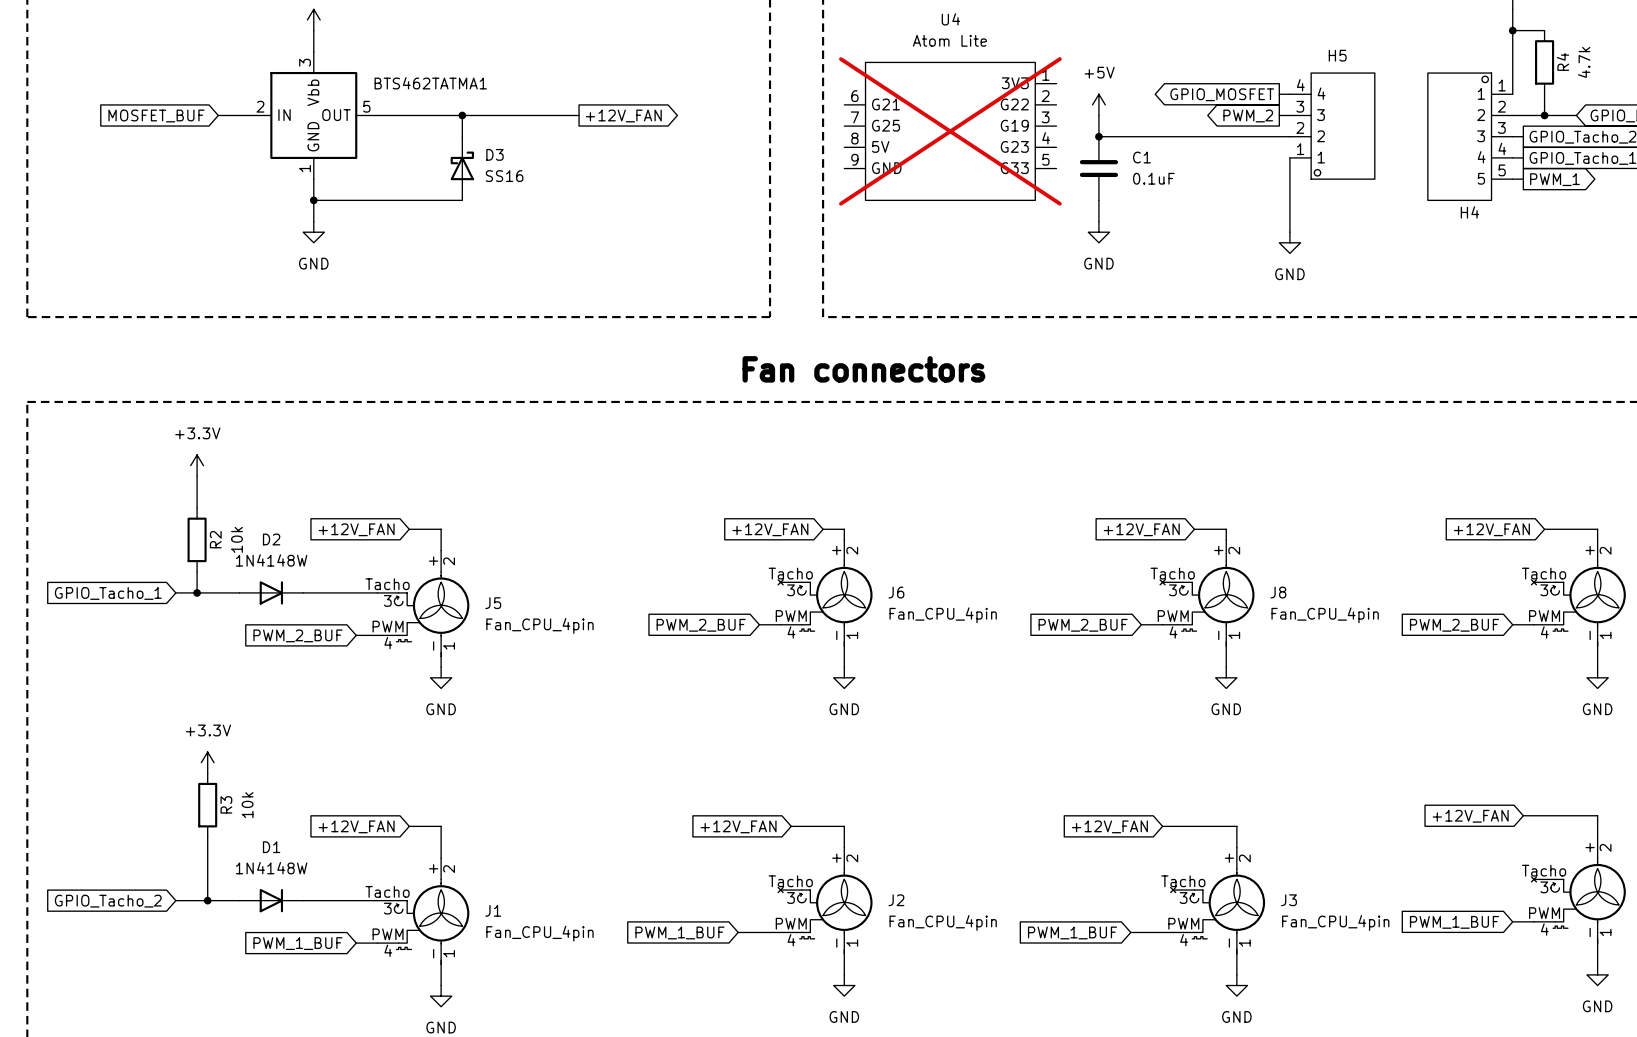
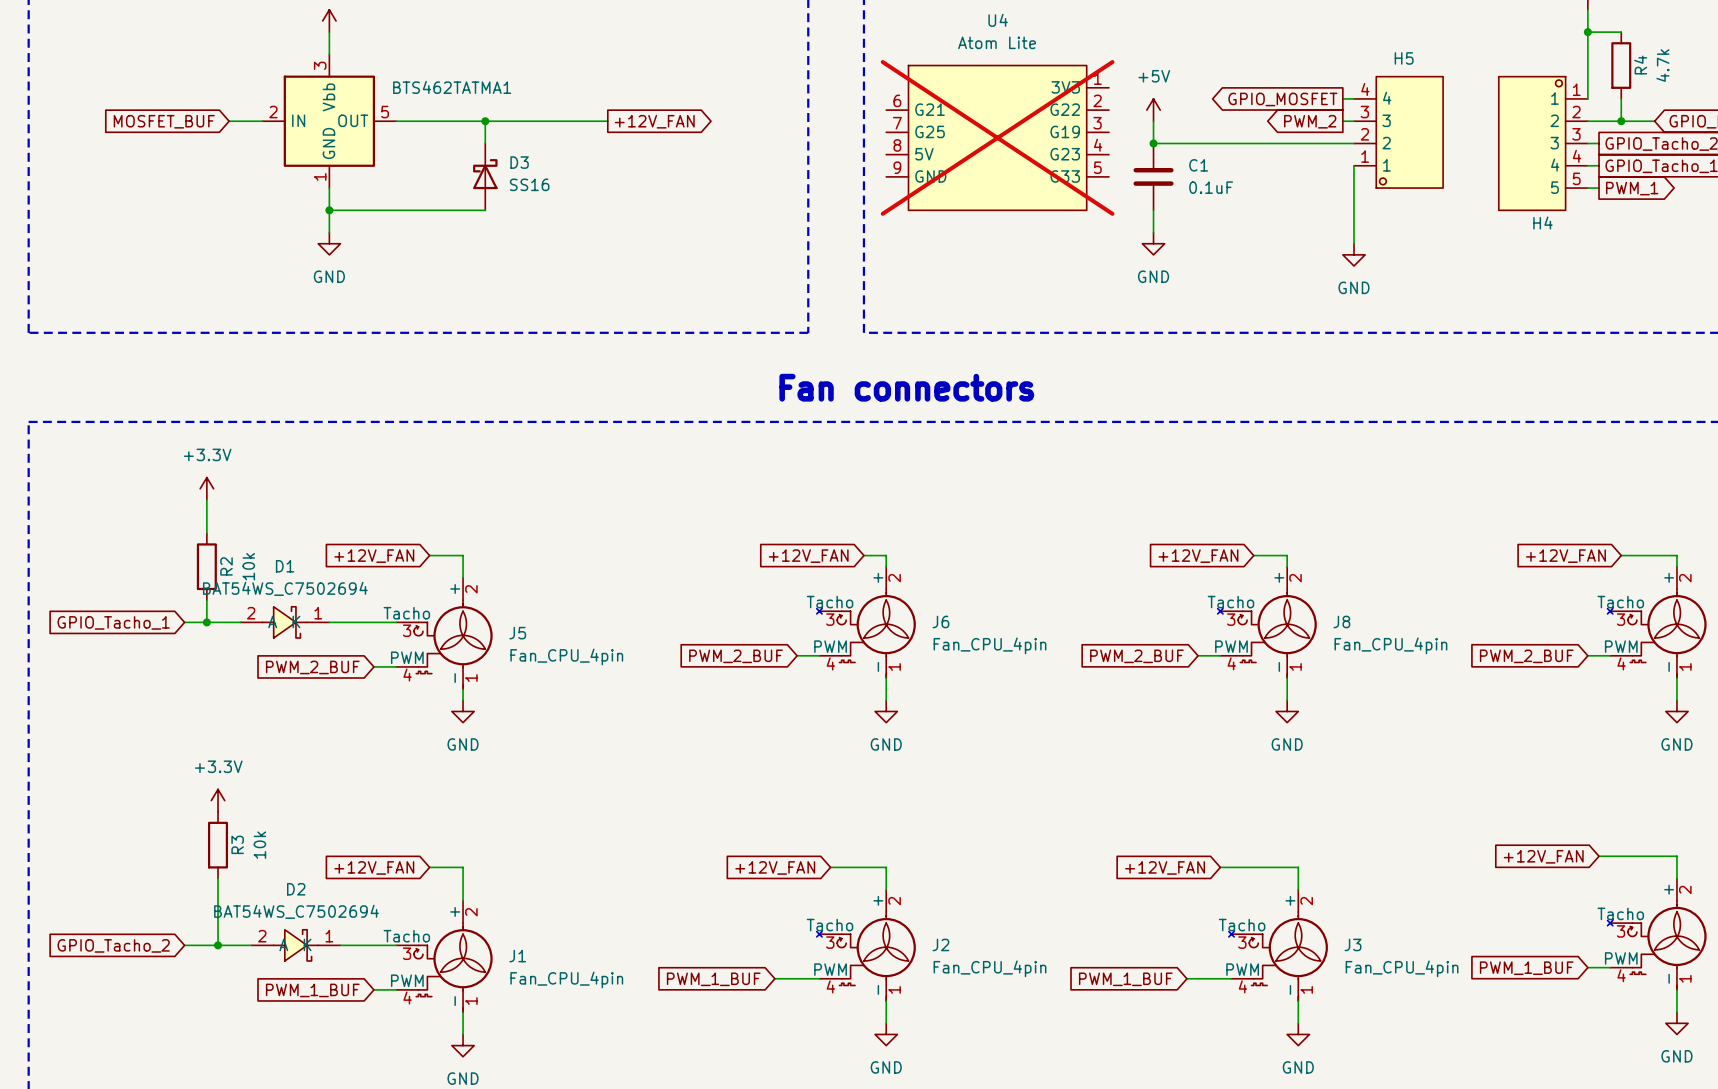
D2 value: 1N4148W (271, 560) -> BAT54WS_C7502694 (296, 911)
D2 symbol: [239, 581, 304, 605] -> [251, 929, 341, 961]
D1 value: 1N4148W (271, 868) -> BAT54WS_C7502694 (285, 588)
D1 symbol: [239, 888, 304, 913] -> [240, 606, 330, 639]

